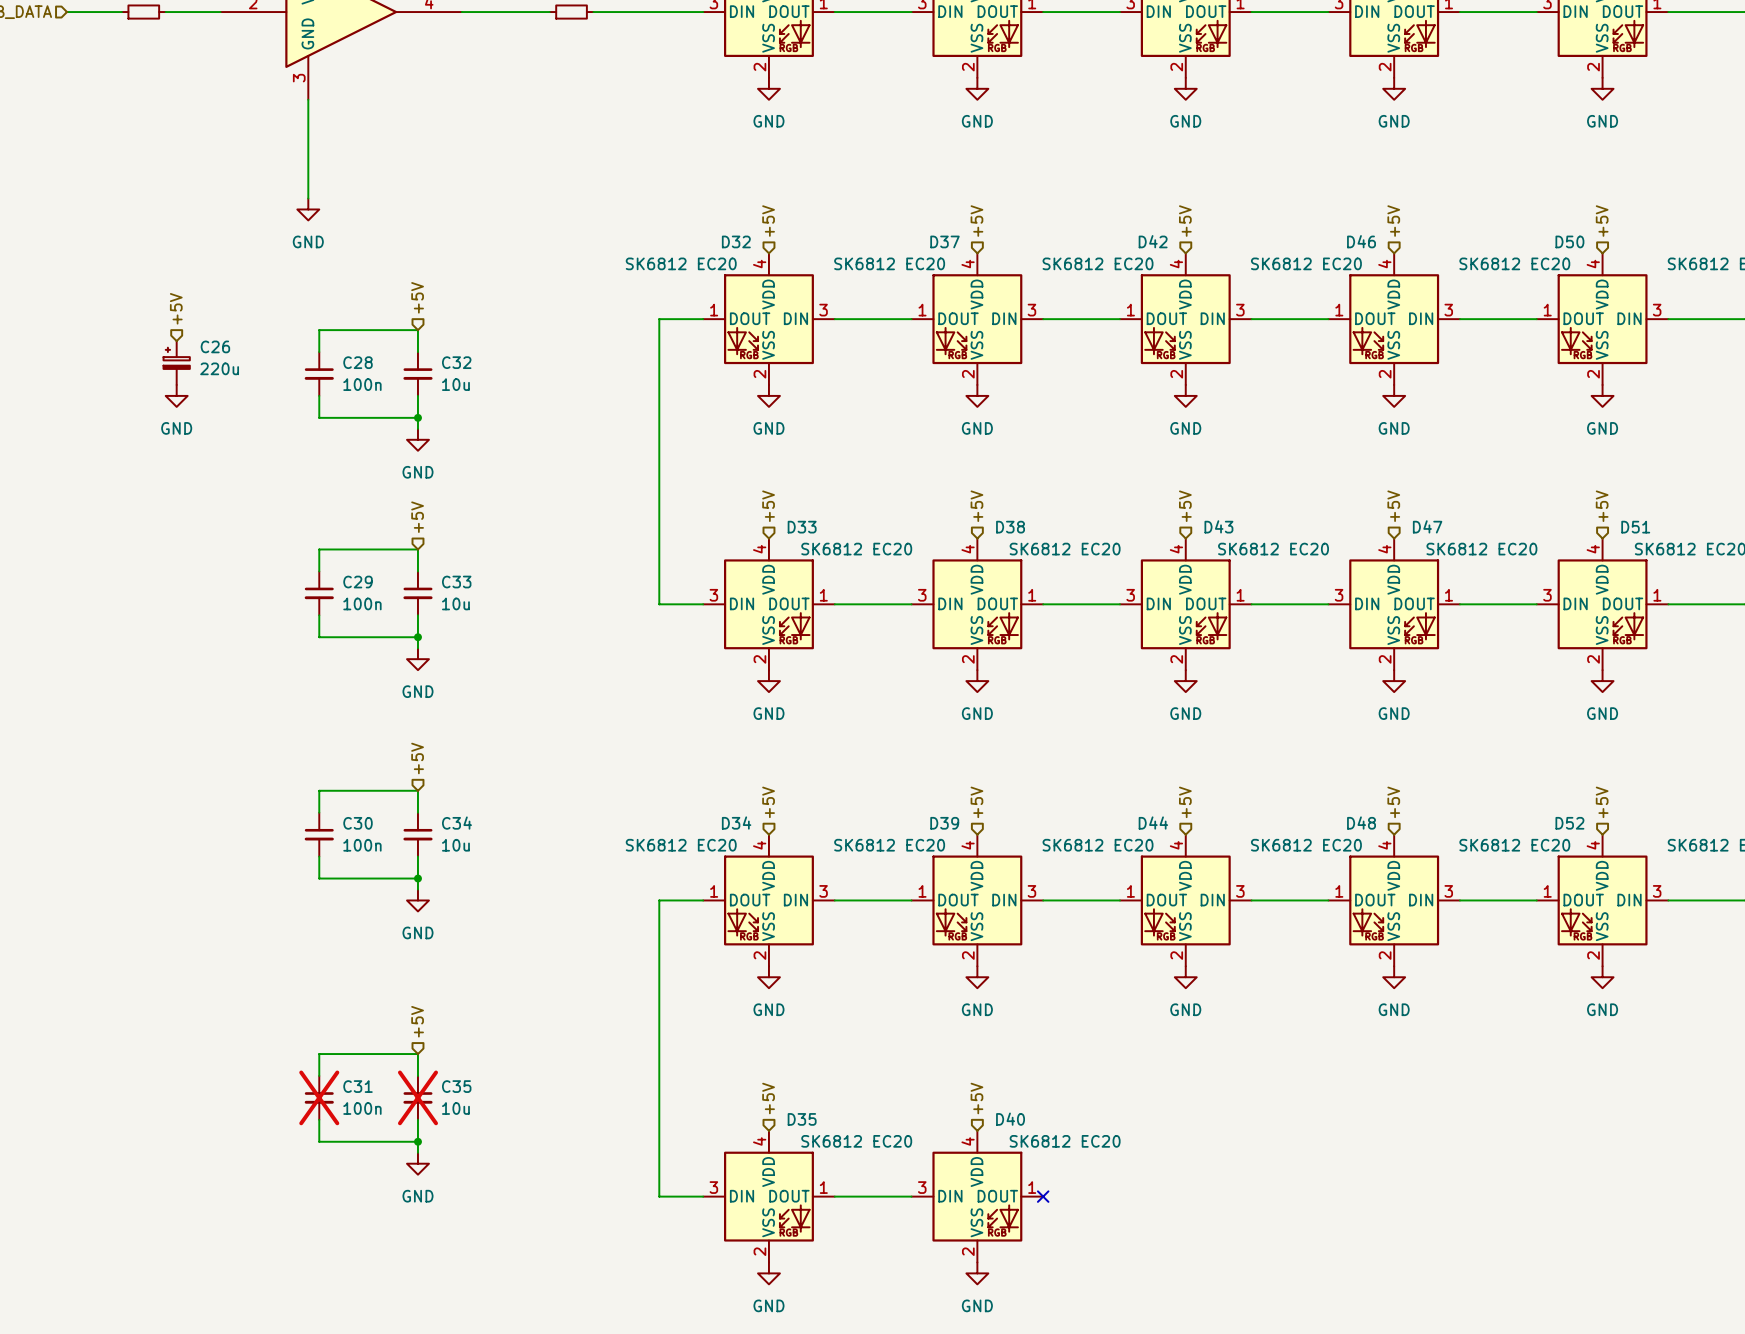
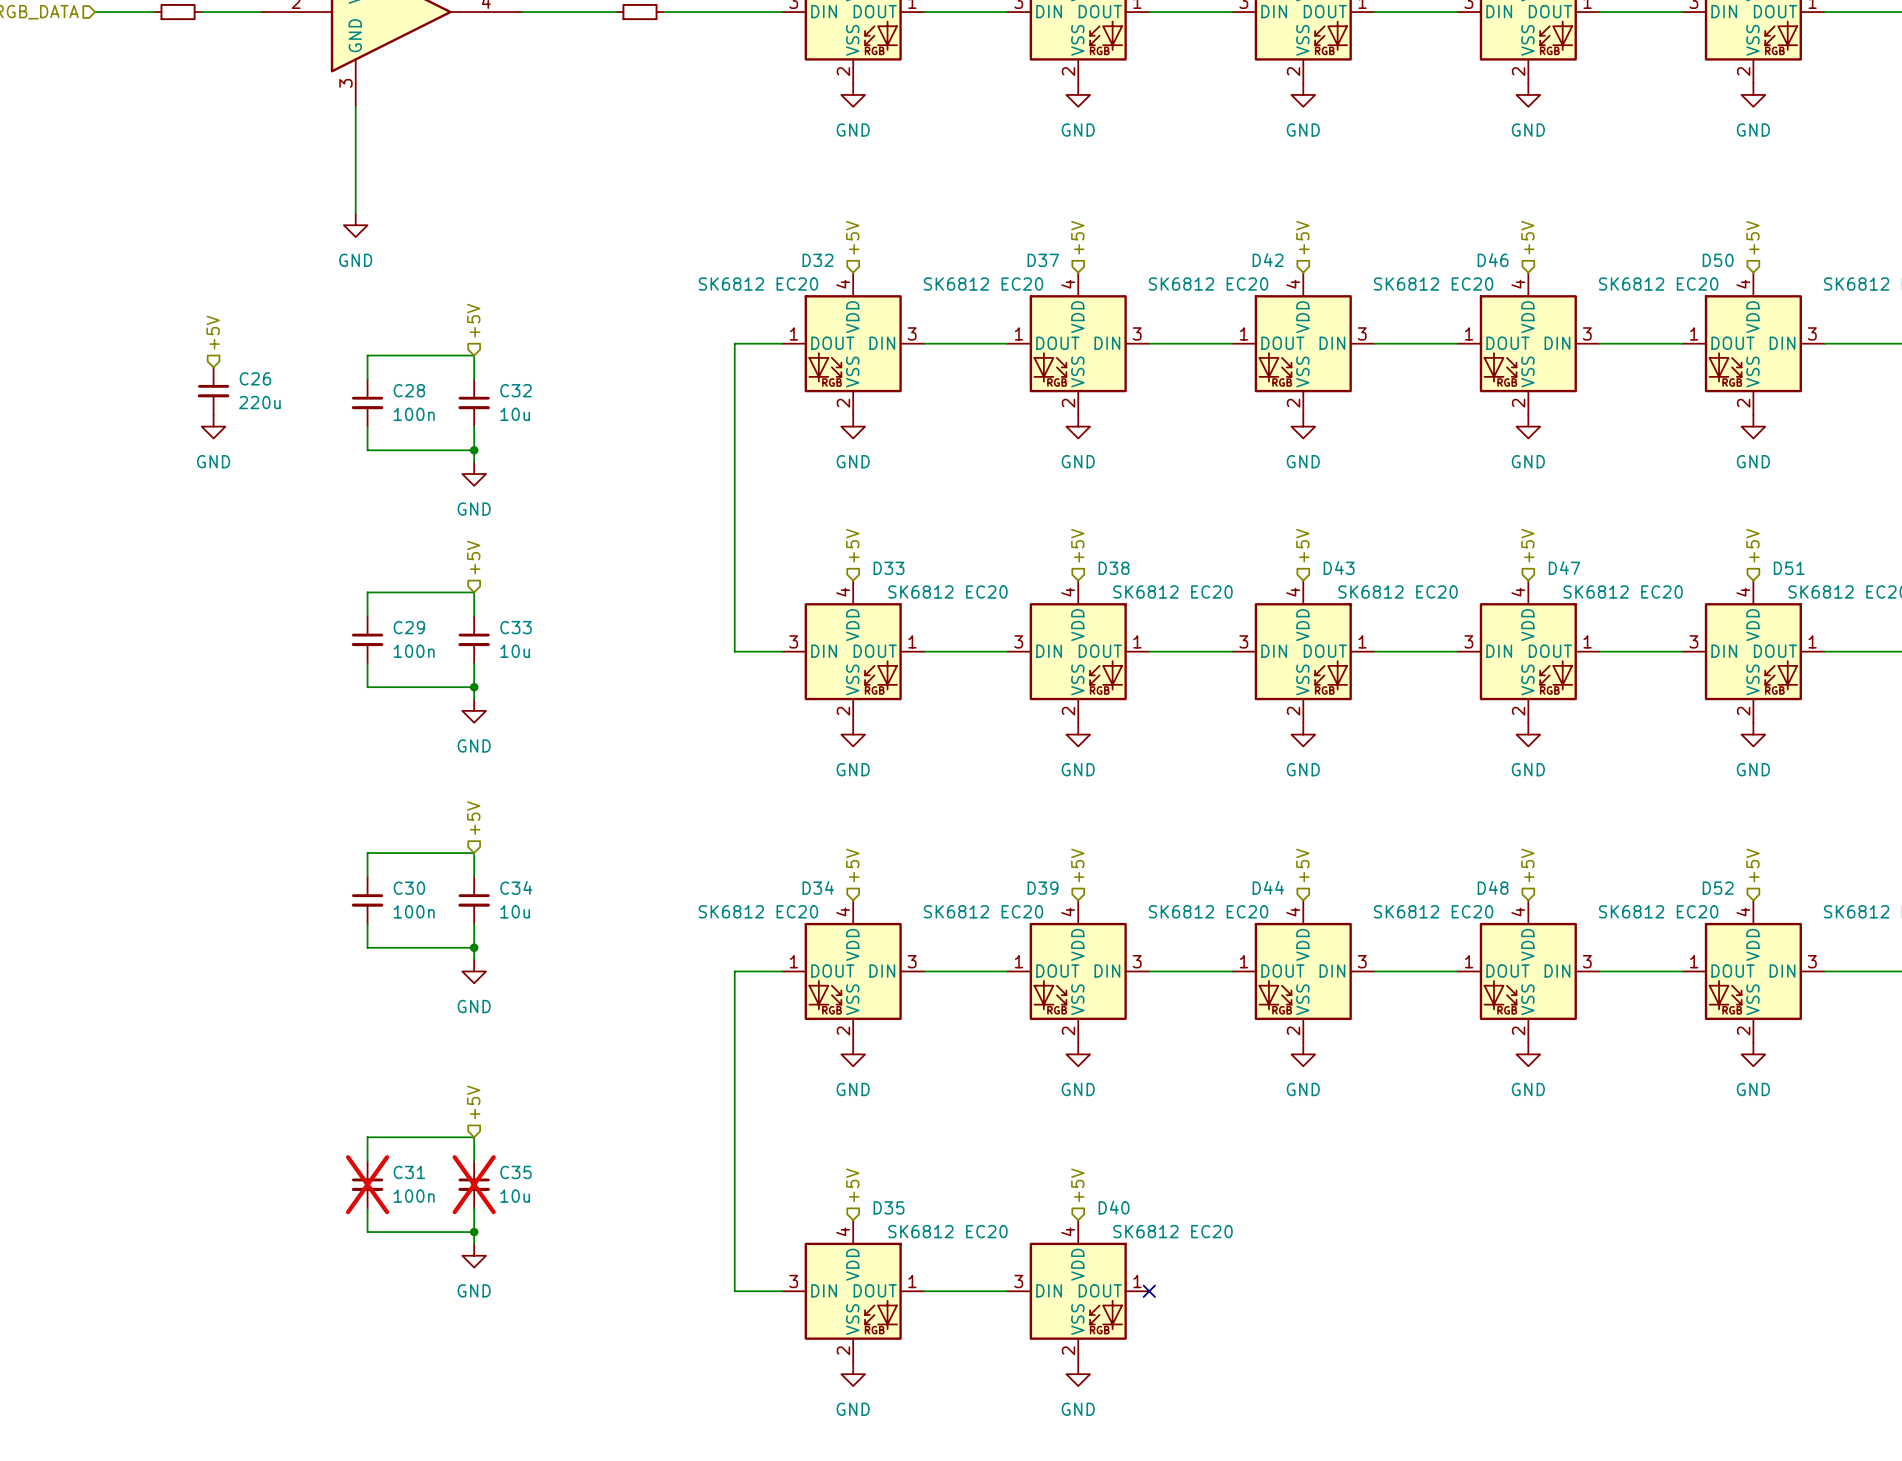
C26 symbol: [163, 341, 190, 385] -> [197, 367, 230, 415]

